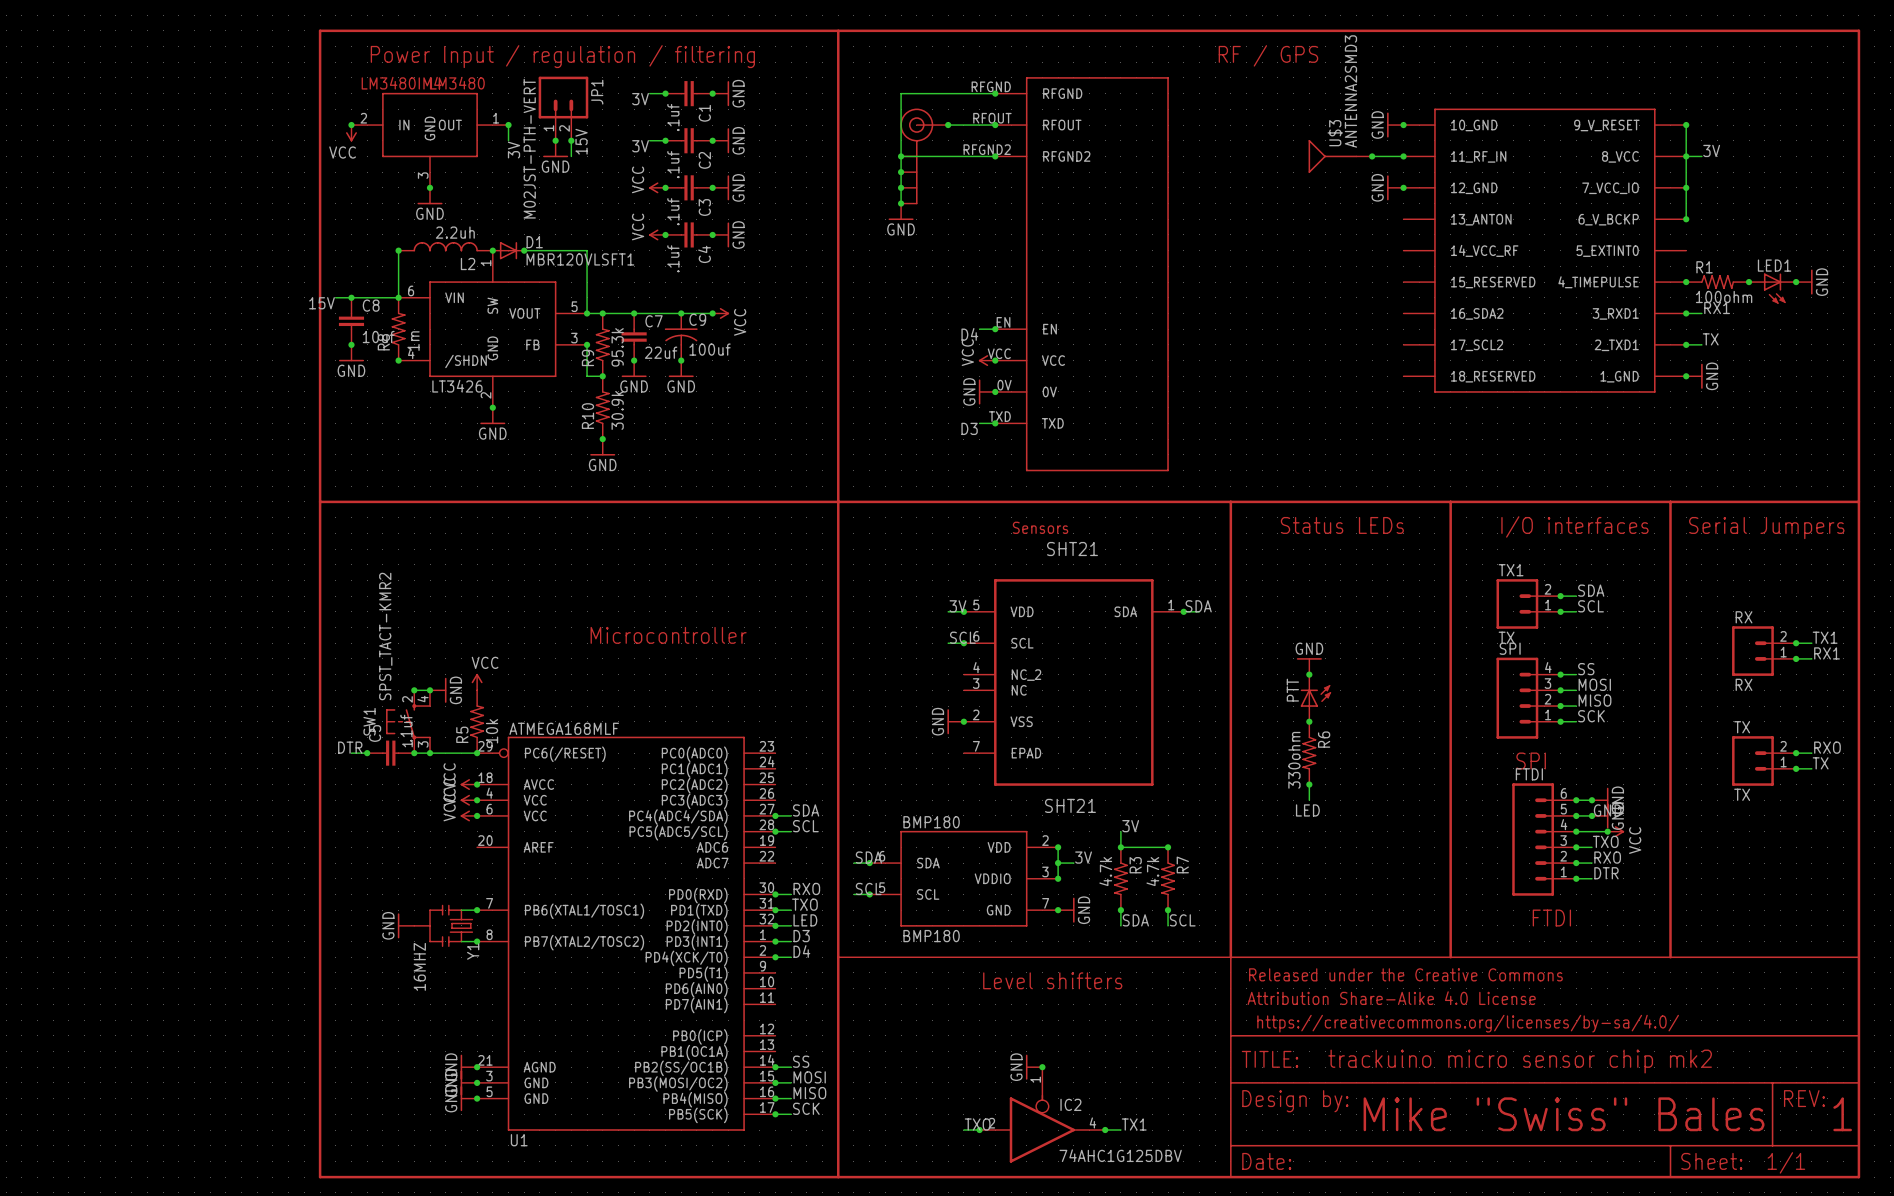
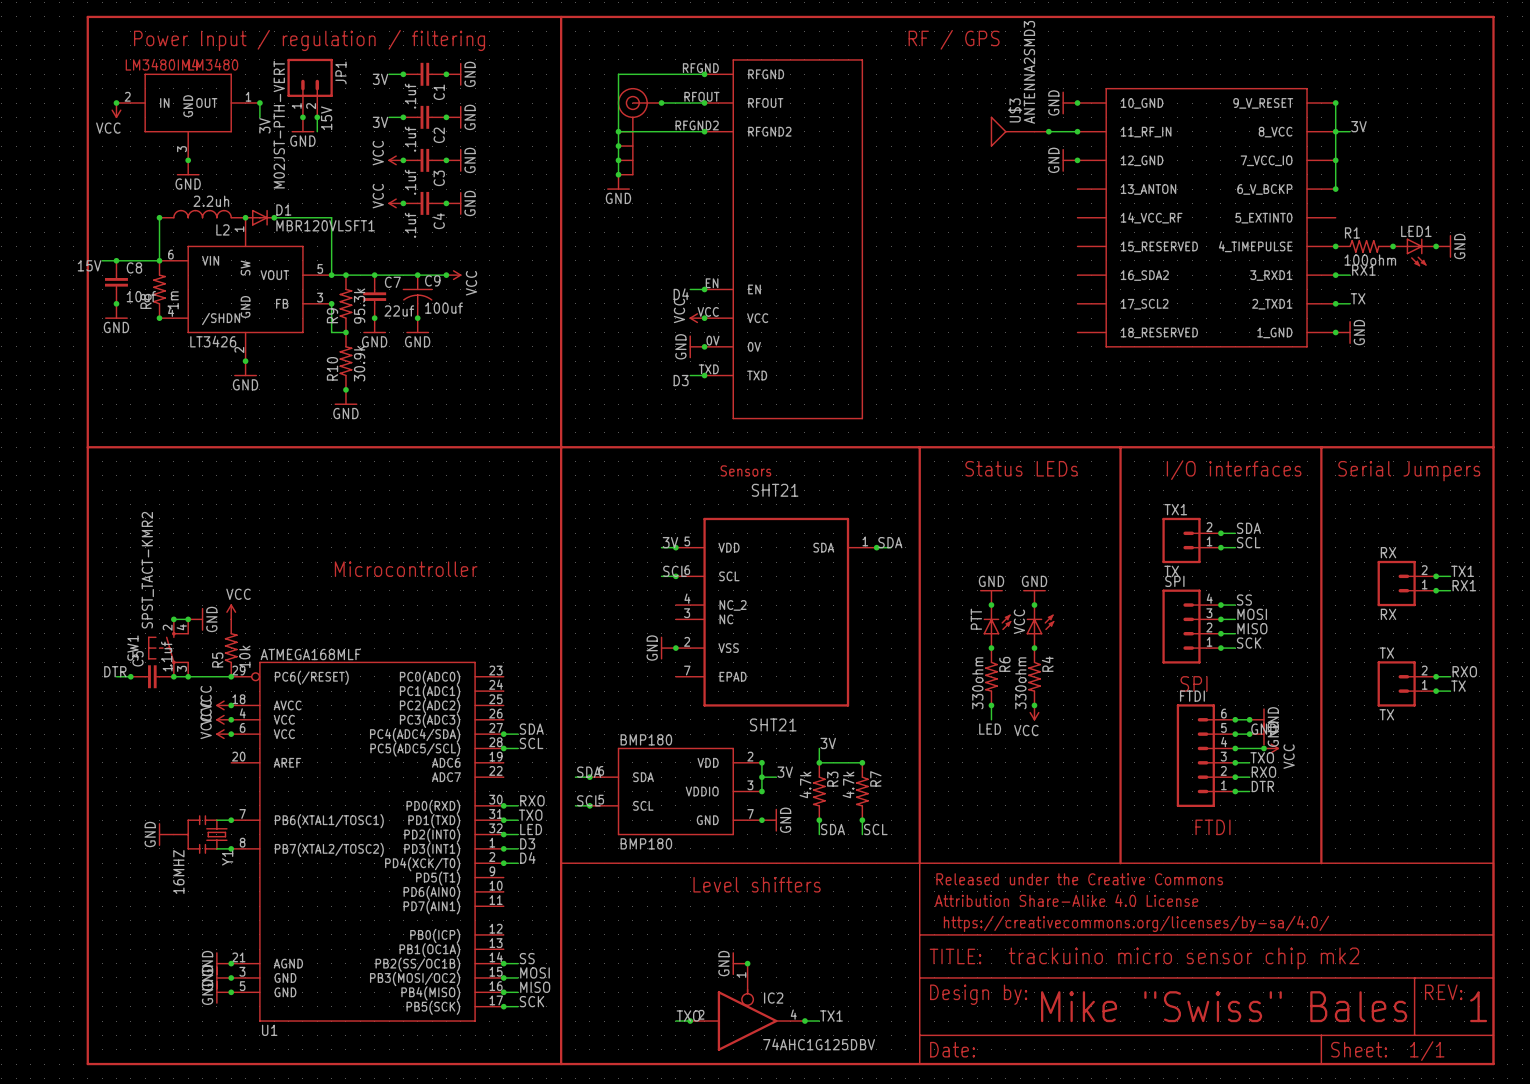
power symbol: none -> GND (1034, 597)
junction: none -> (1034, 605)
VCC: none -> (1040, 626)
junction: none -> (1034, 648)
R4: none -> 330ohm (1034, 676)
junction: none -> (1034, 705)
power symbol: none -> VCC (1034, 712)

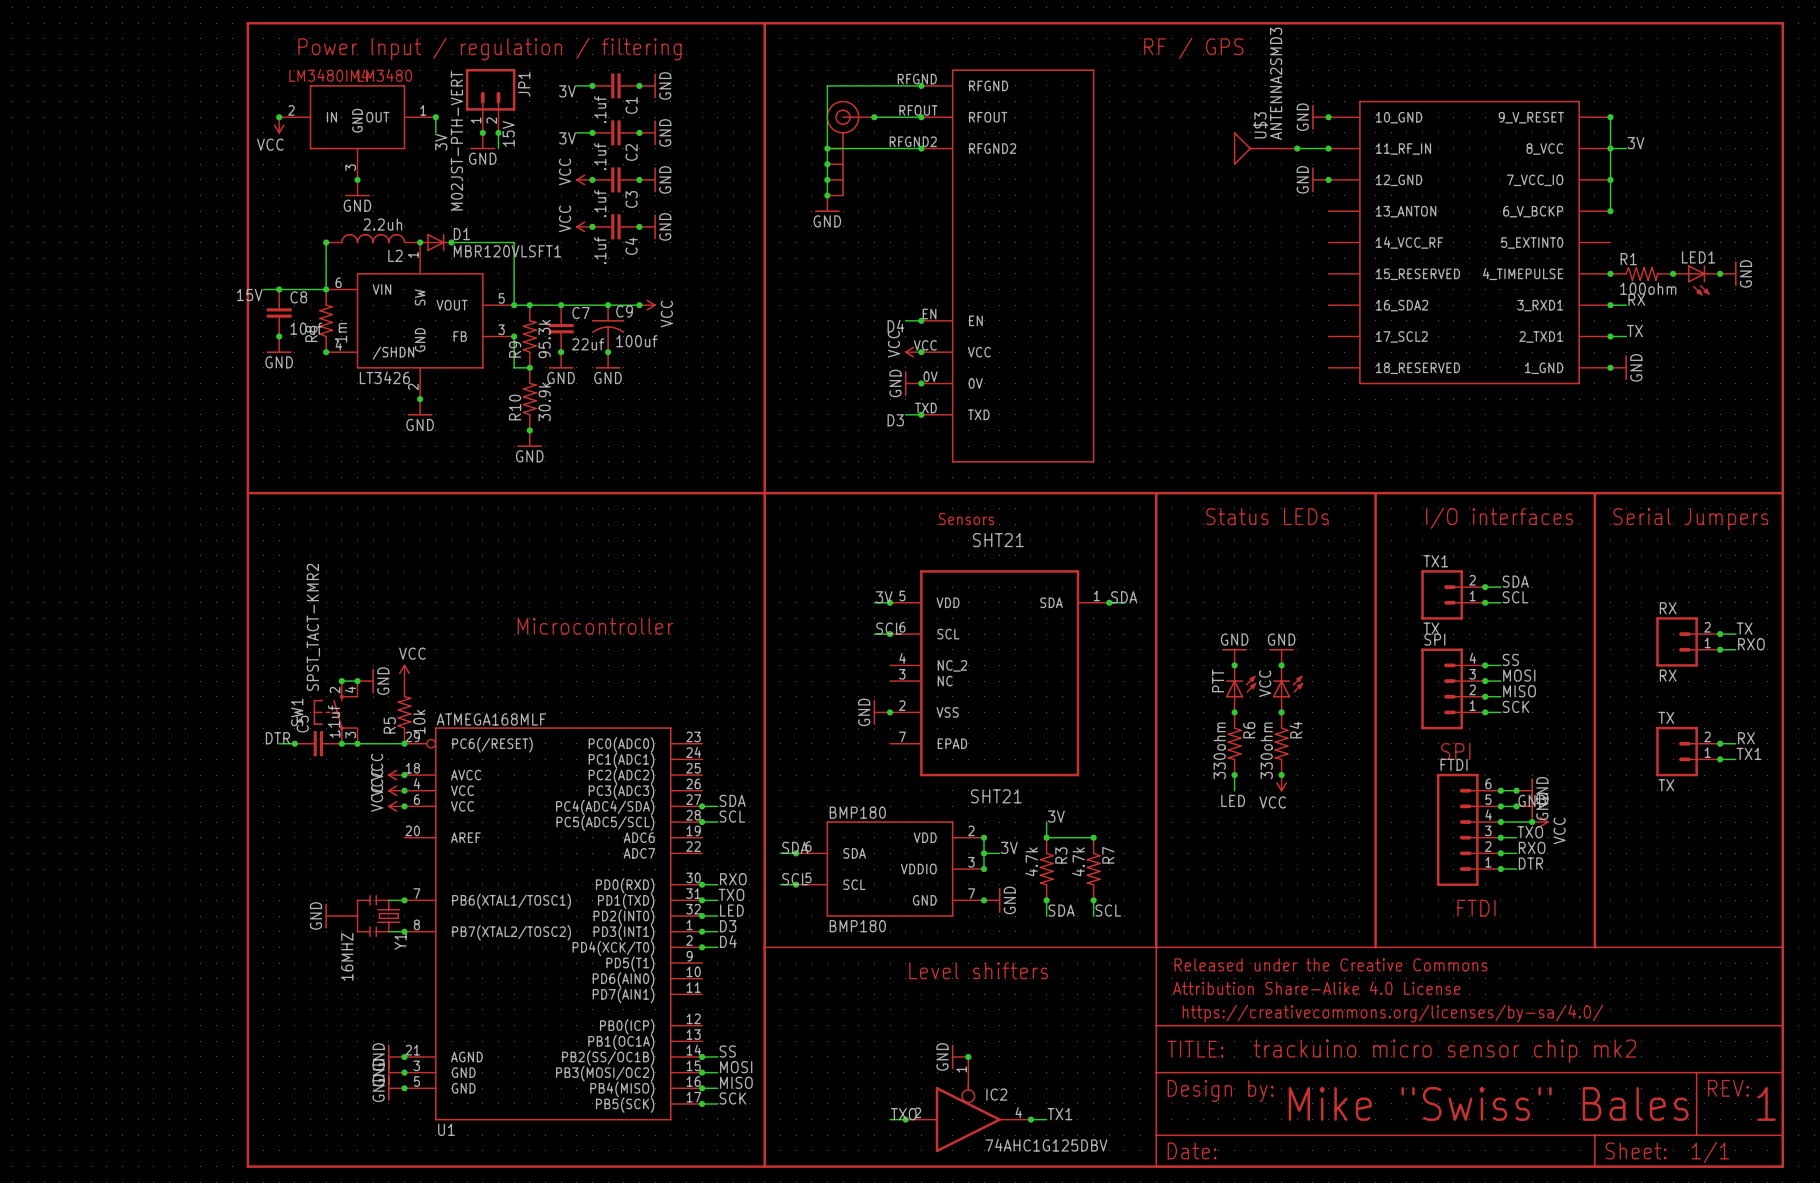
label: RX1 (1363, 270) -> RX (1636, 299)
label: TX1 (1462, 571) -> TX (1744, 628)
label: RX1 (1464, 585) -> RXO (1751, 644)
label: RXO (1464, 671) -> RX (1746, 738)
label: TX (1458, 686) -> TX1 (1749, 753)

